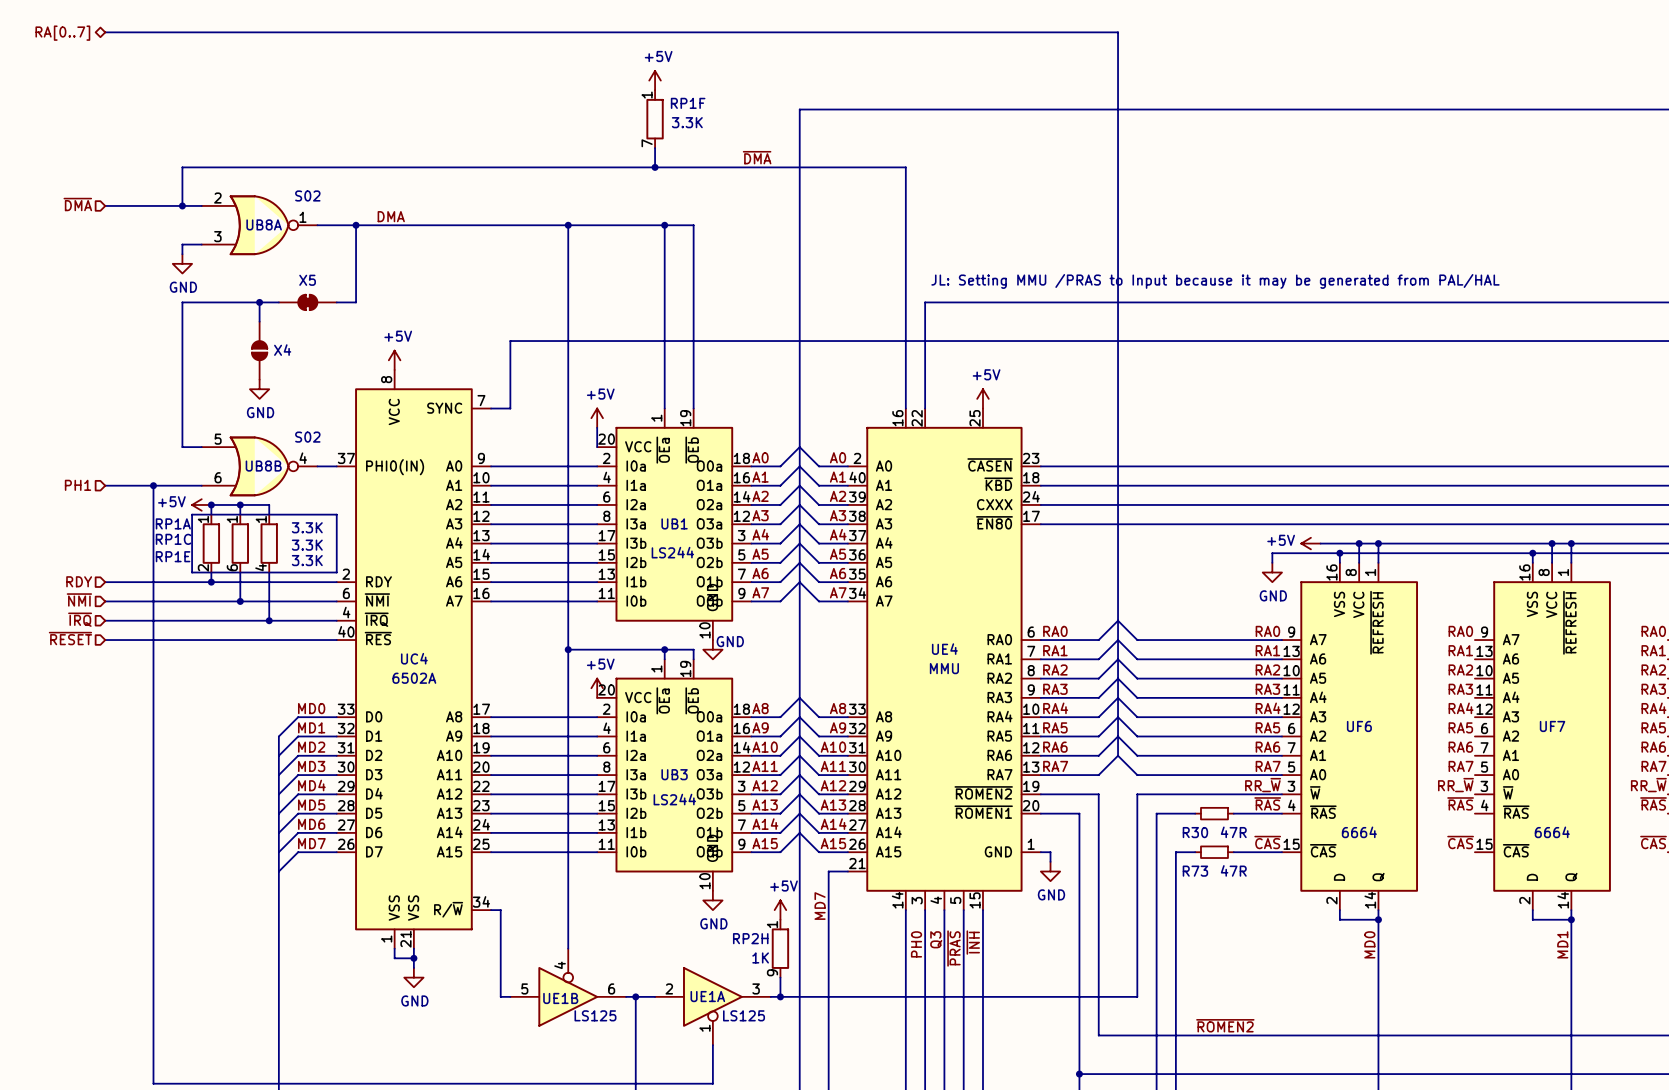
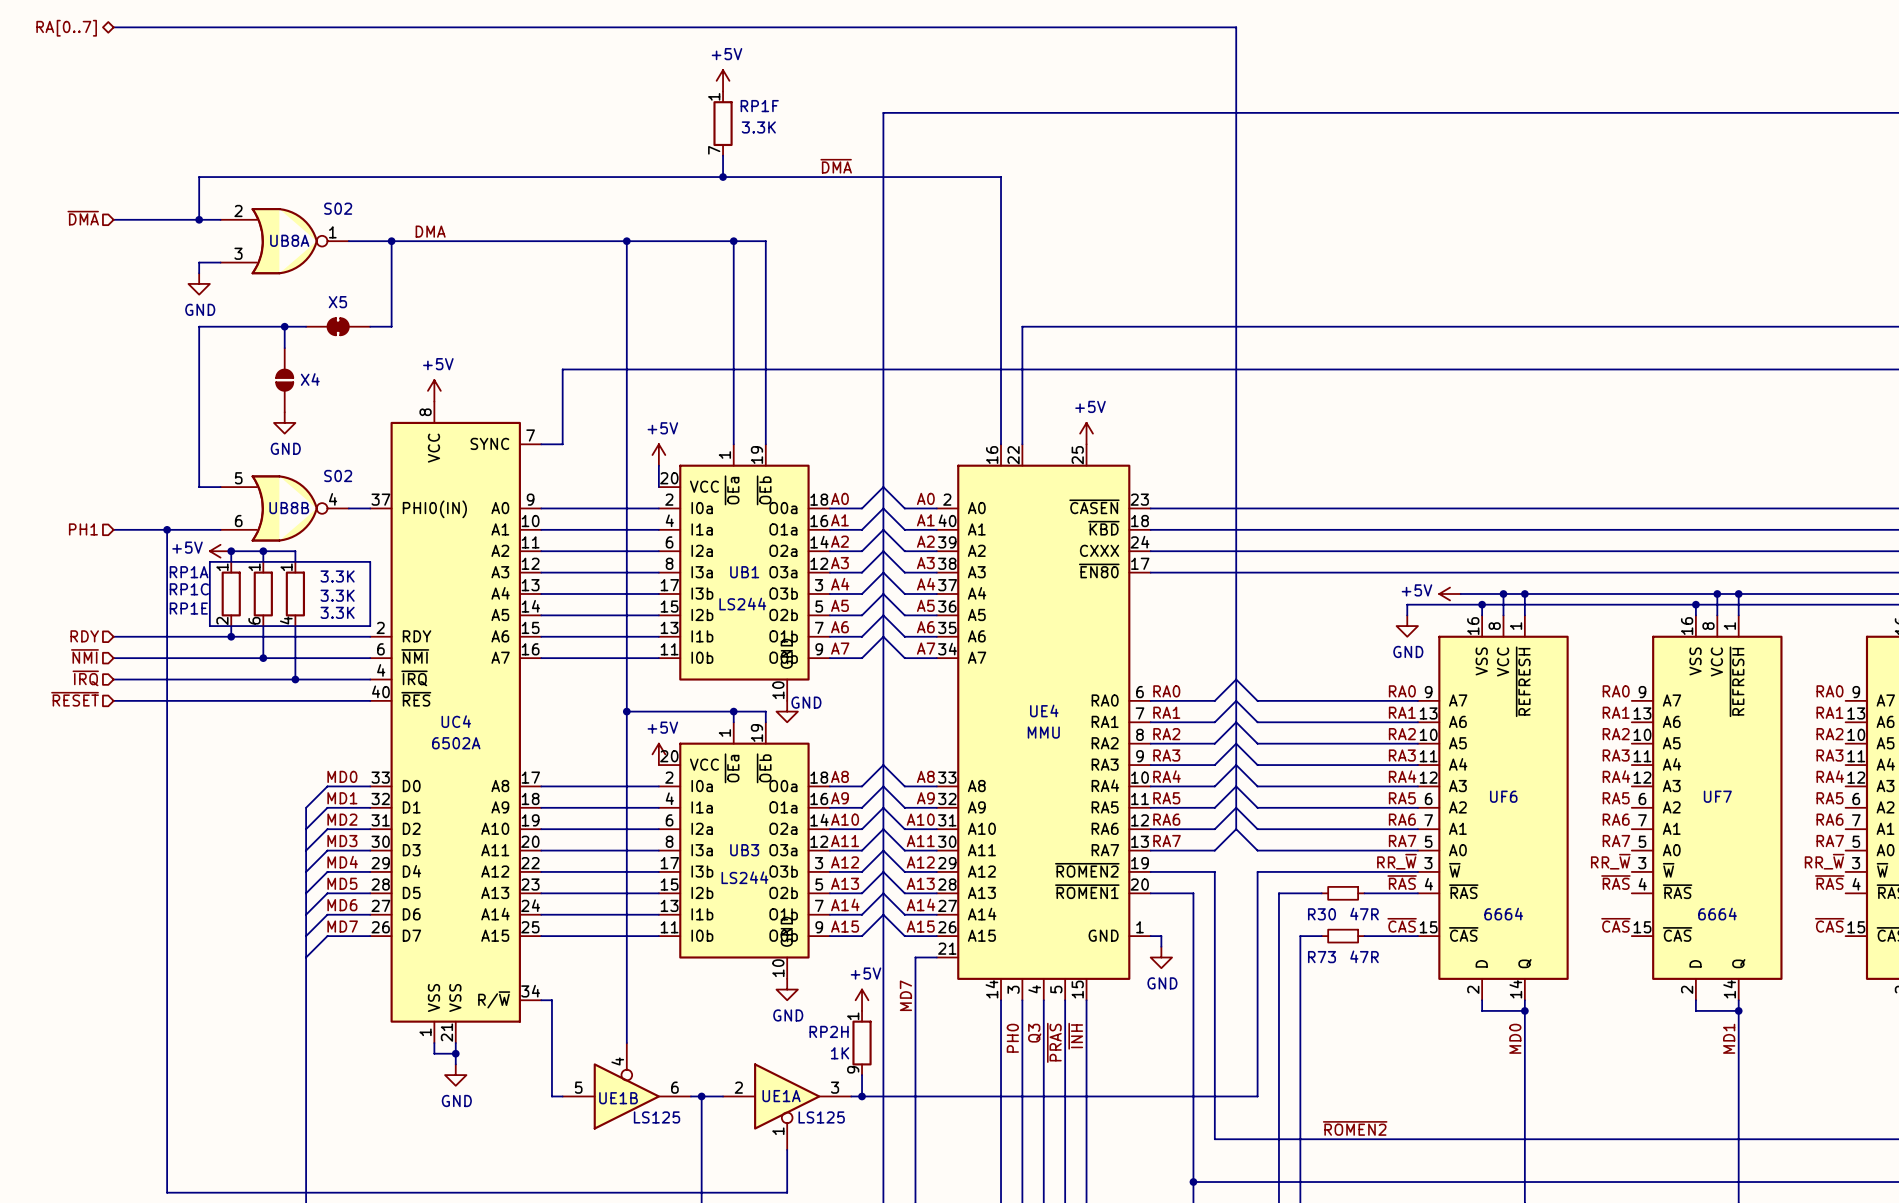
text: JL: Setting MMU /PRAS to Input because it may be generated from PAL/HAL (1215, 281) -> none

